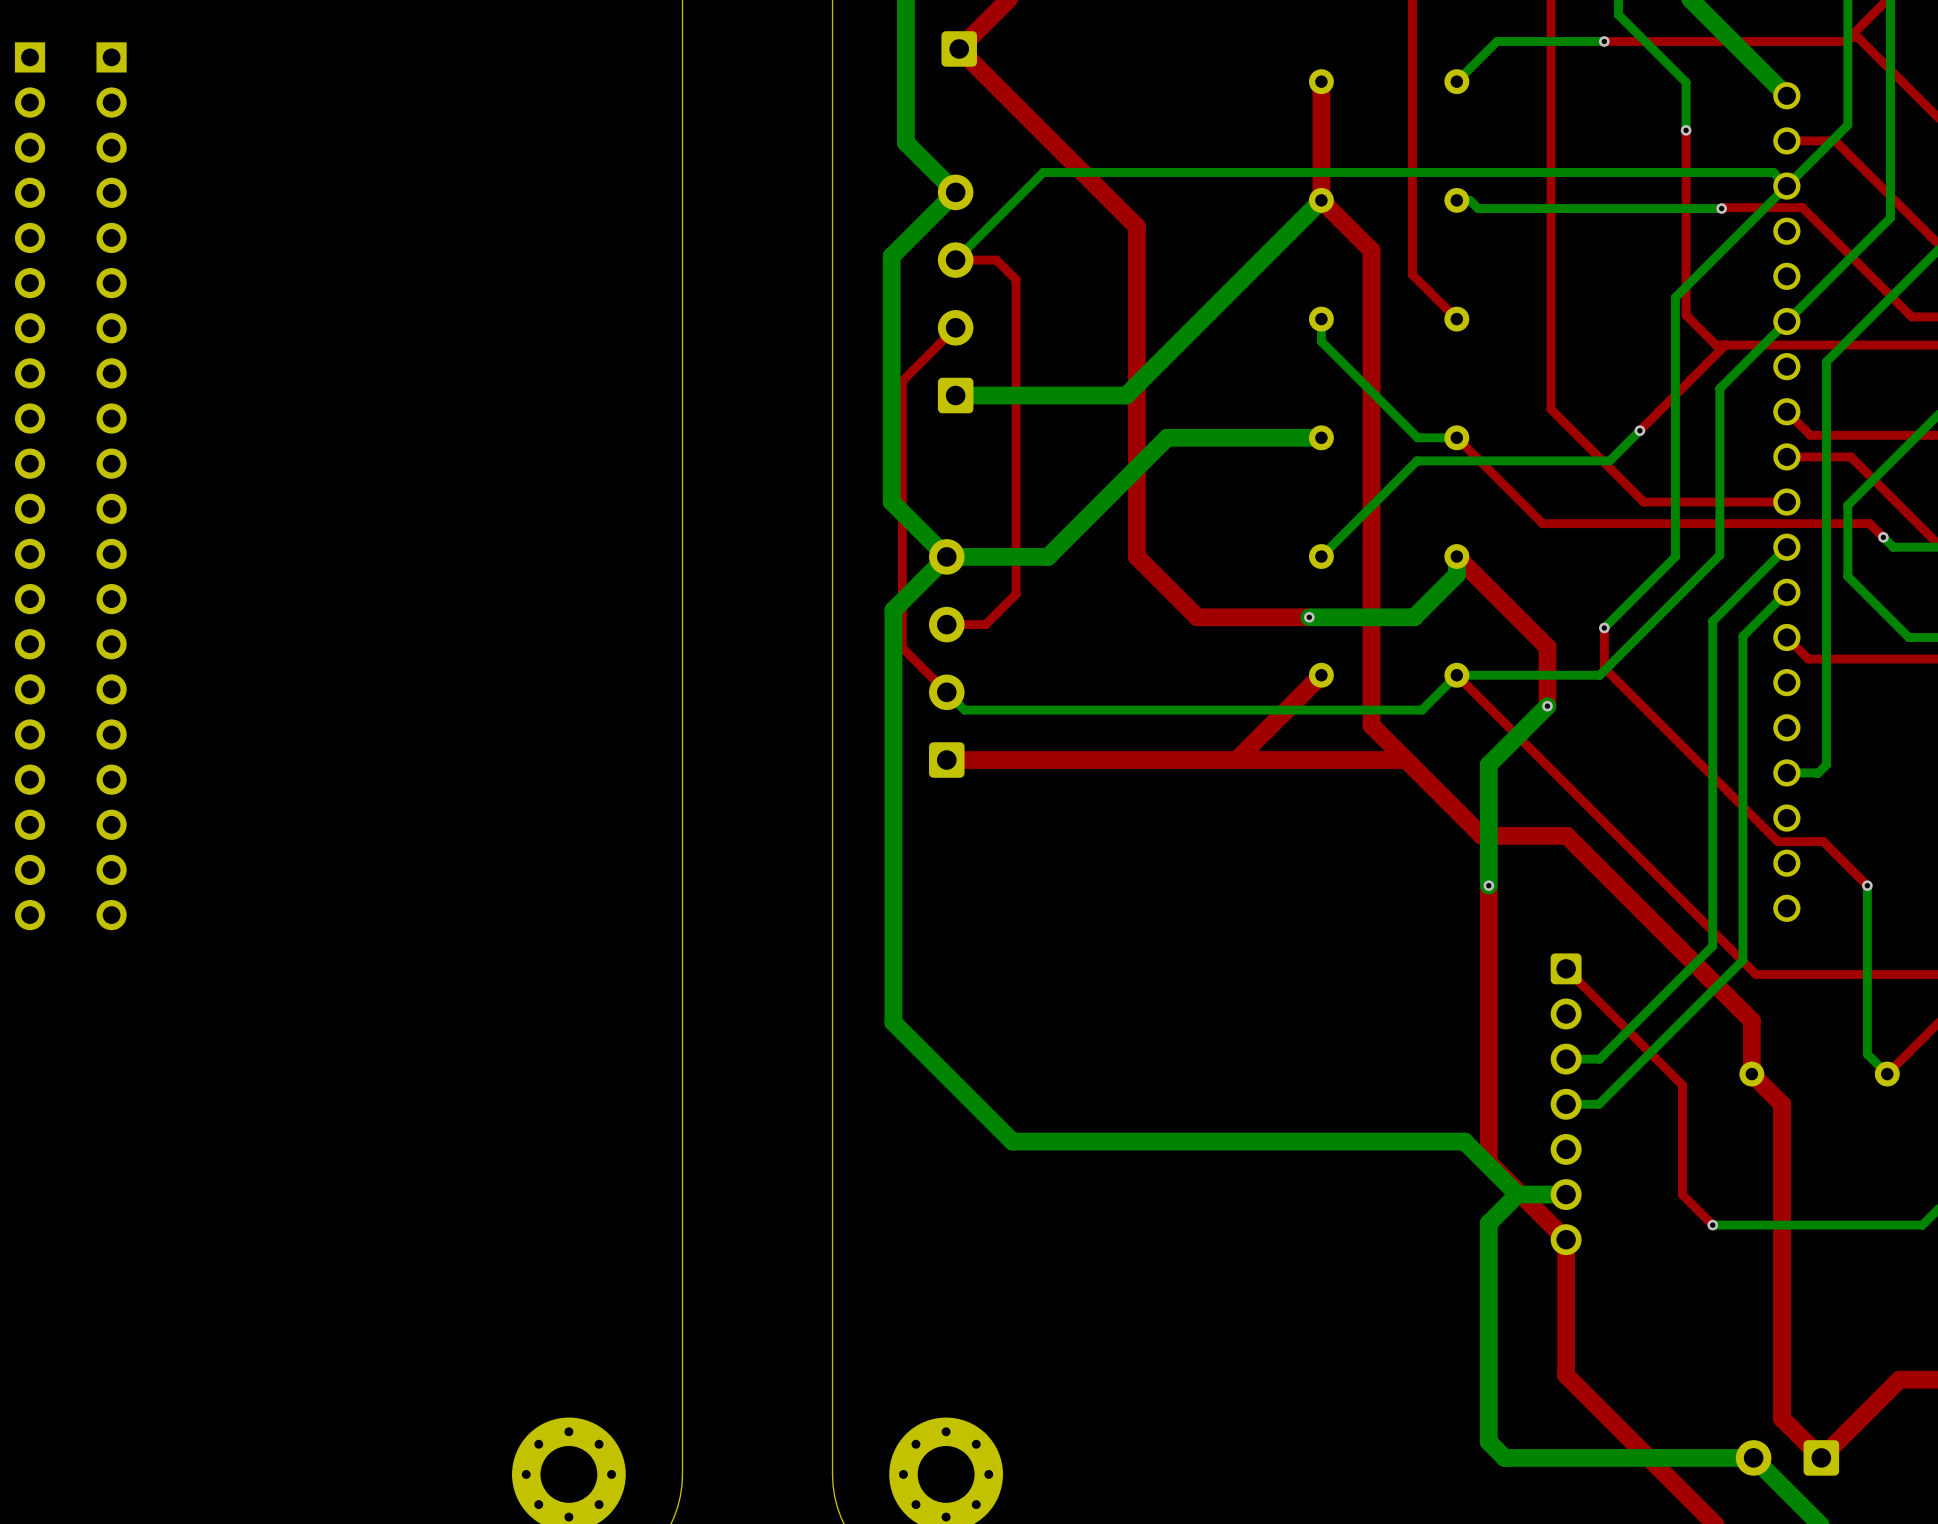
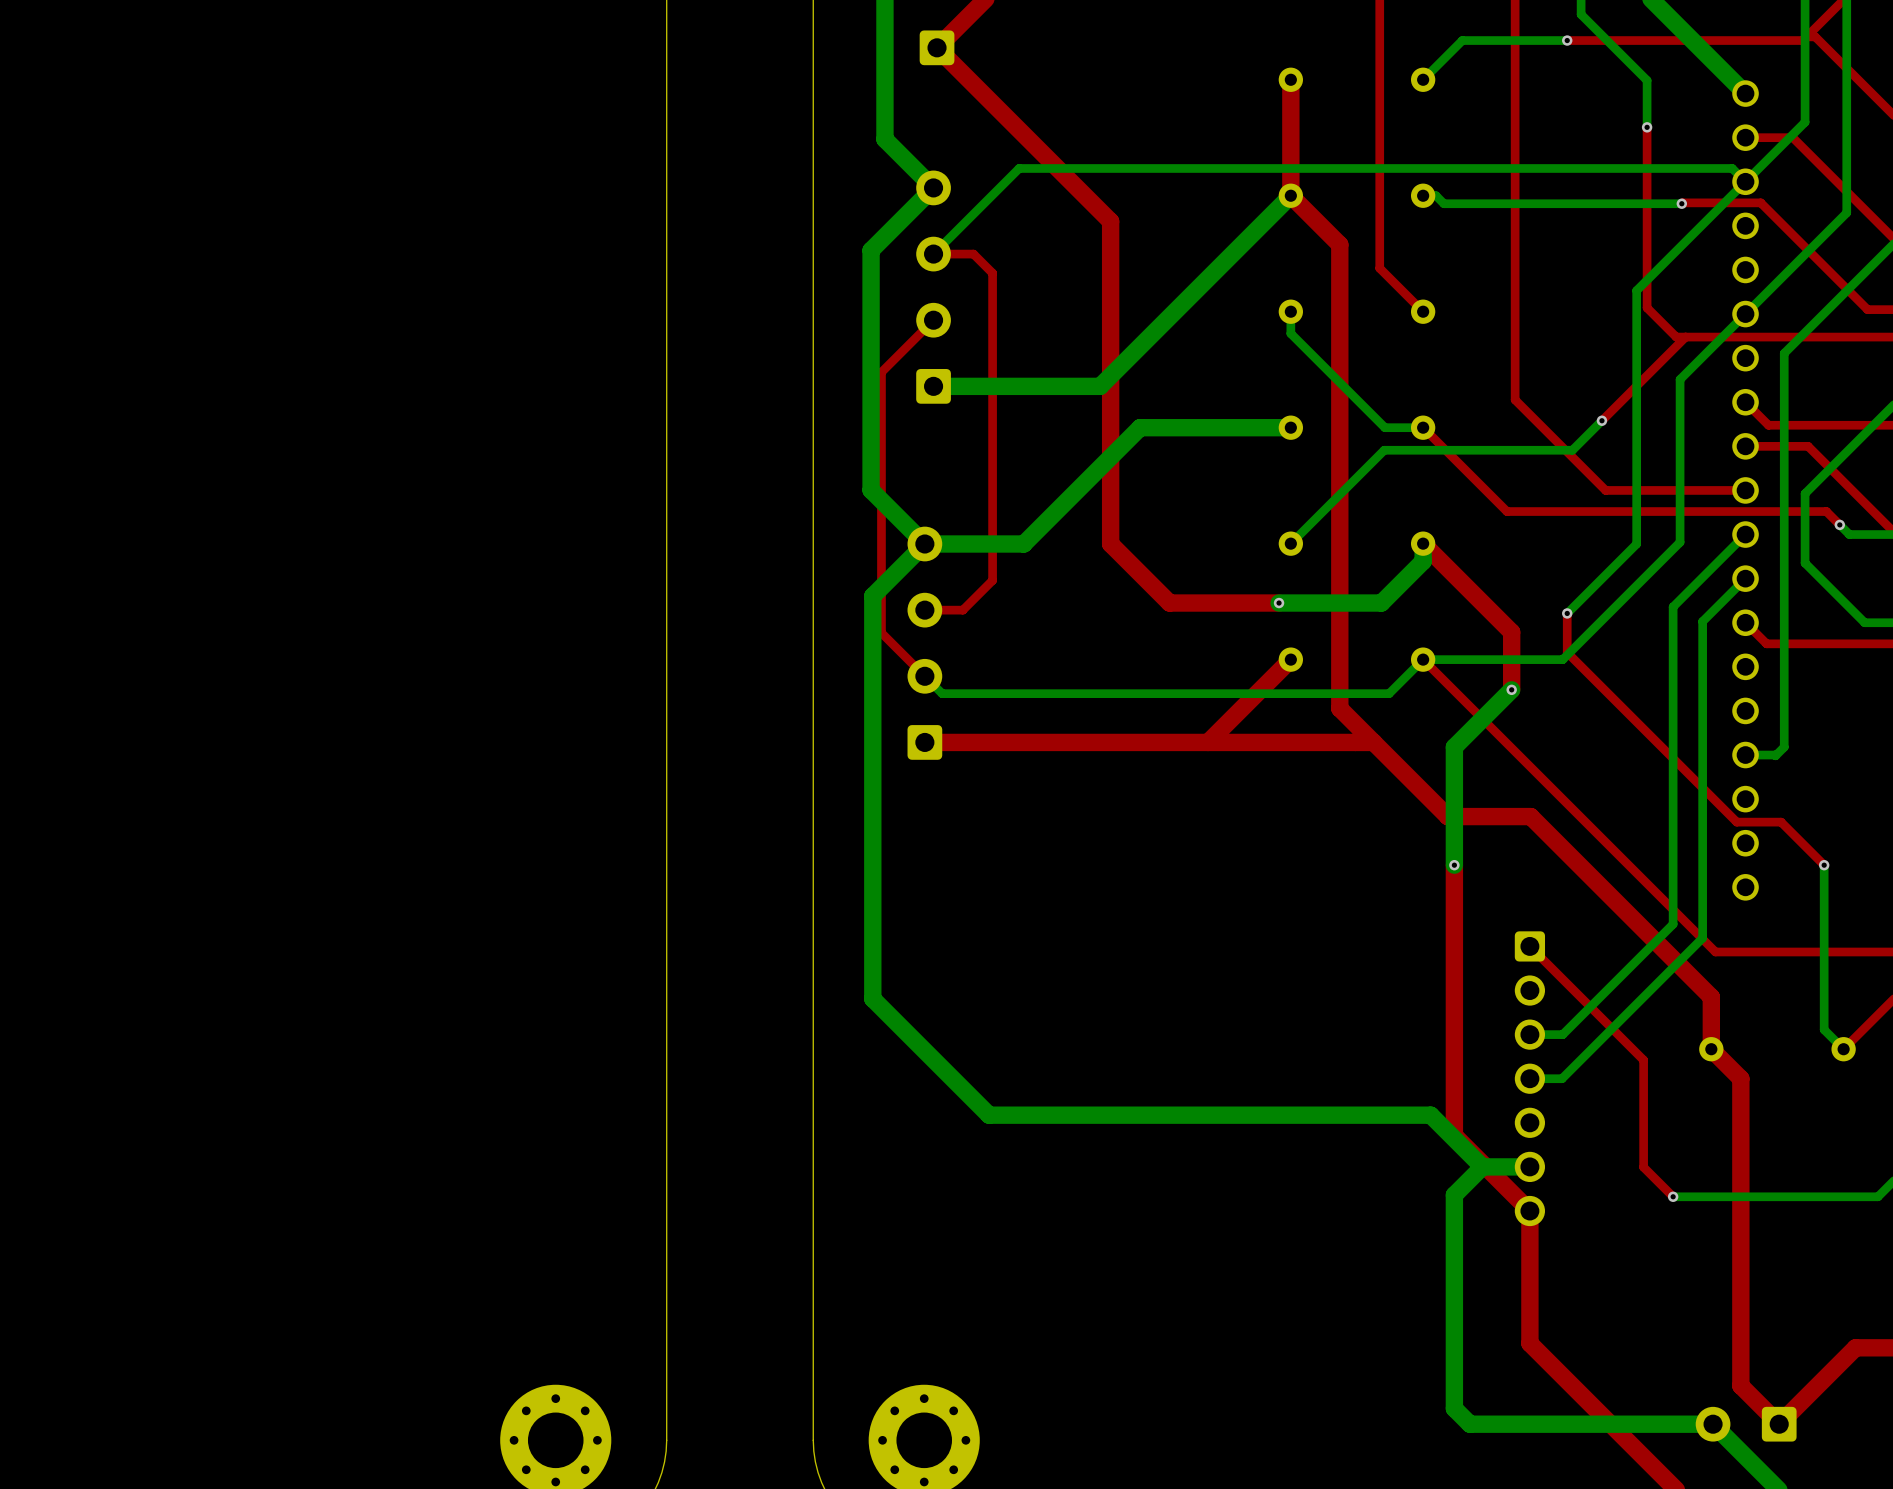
part: (30, 486) -> none
part: (111, 486) -> none

